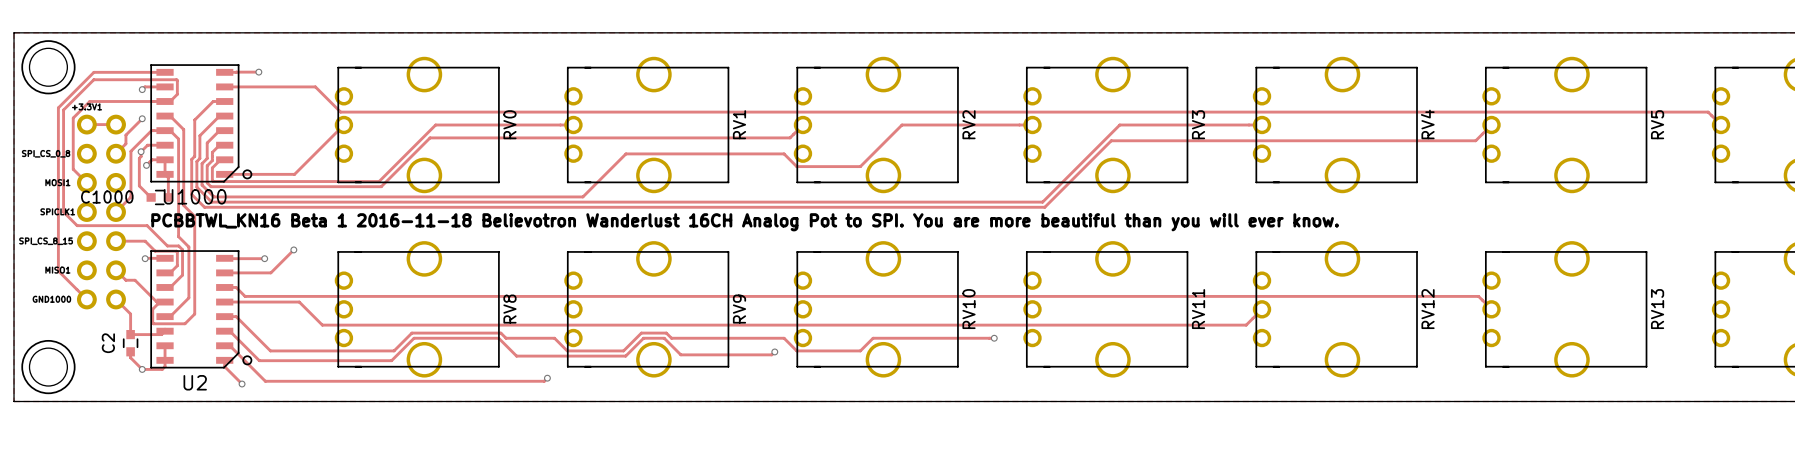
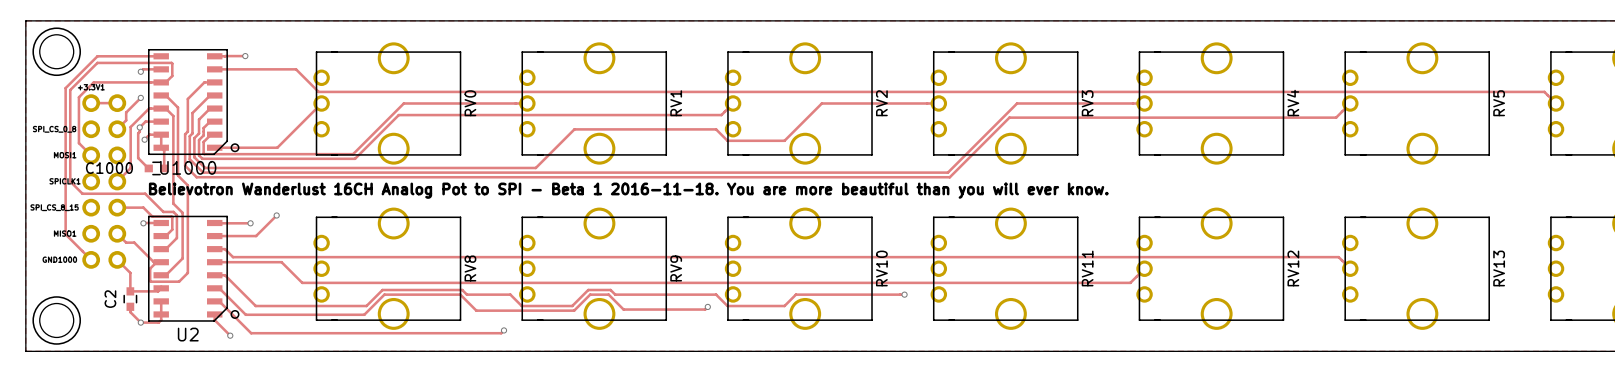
text: PCBBTWL_KN16 Beta 1 2016-11-18 Believotron Wanderlust 16CH Analog Pot to SPI. You are more beautiful than you will ever know. (745, 222) -> Believotron Wanderlust 16CH Analog Pot to SPI - Beta 1 2016-11-18. You are more beautiful than you will ever know. (628, 190)

